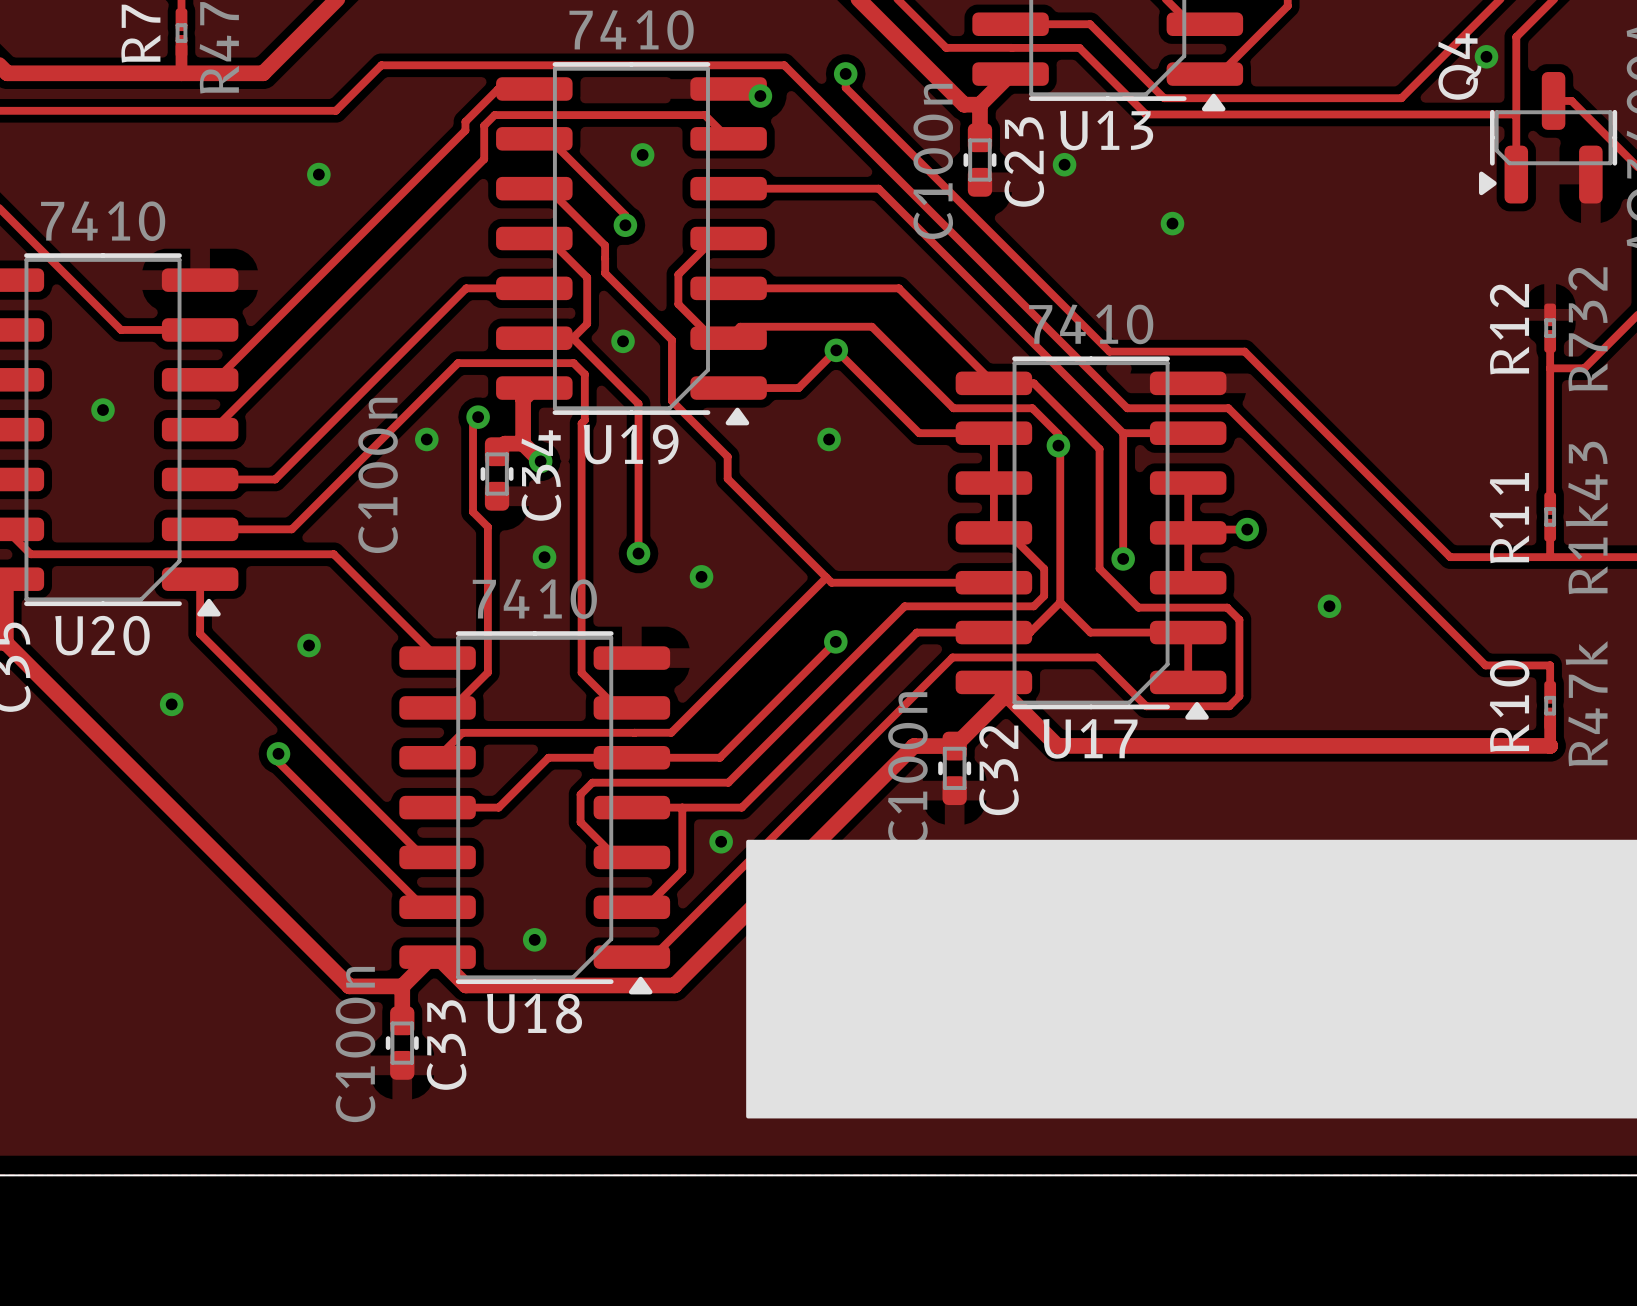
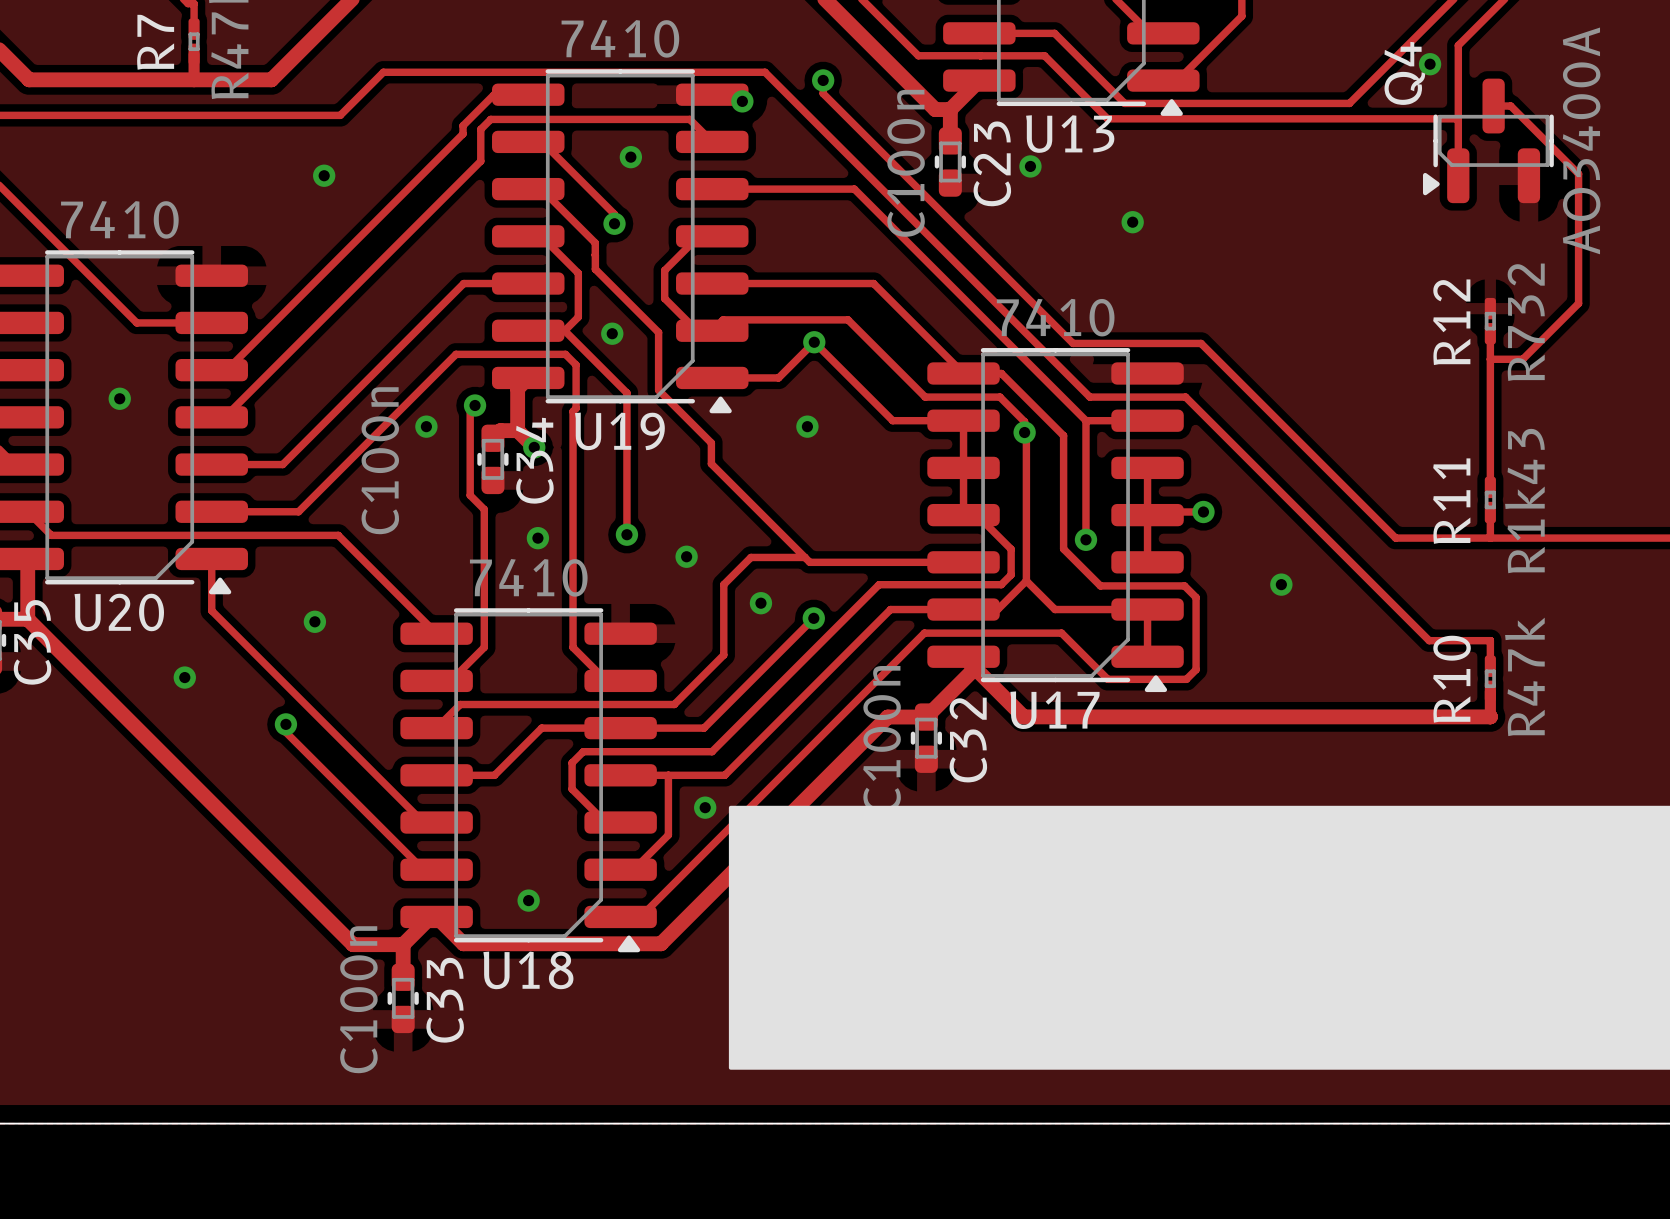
track: (826, 577) (671, 732) -> (804, 557) (750, 557) (723, 584) (723, 655) (674, 704) (657, 704)
via: none -> (760, 603)

